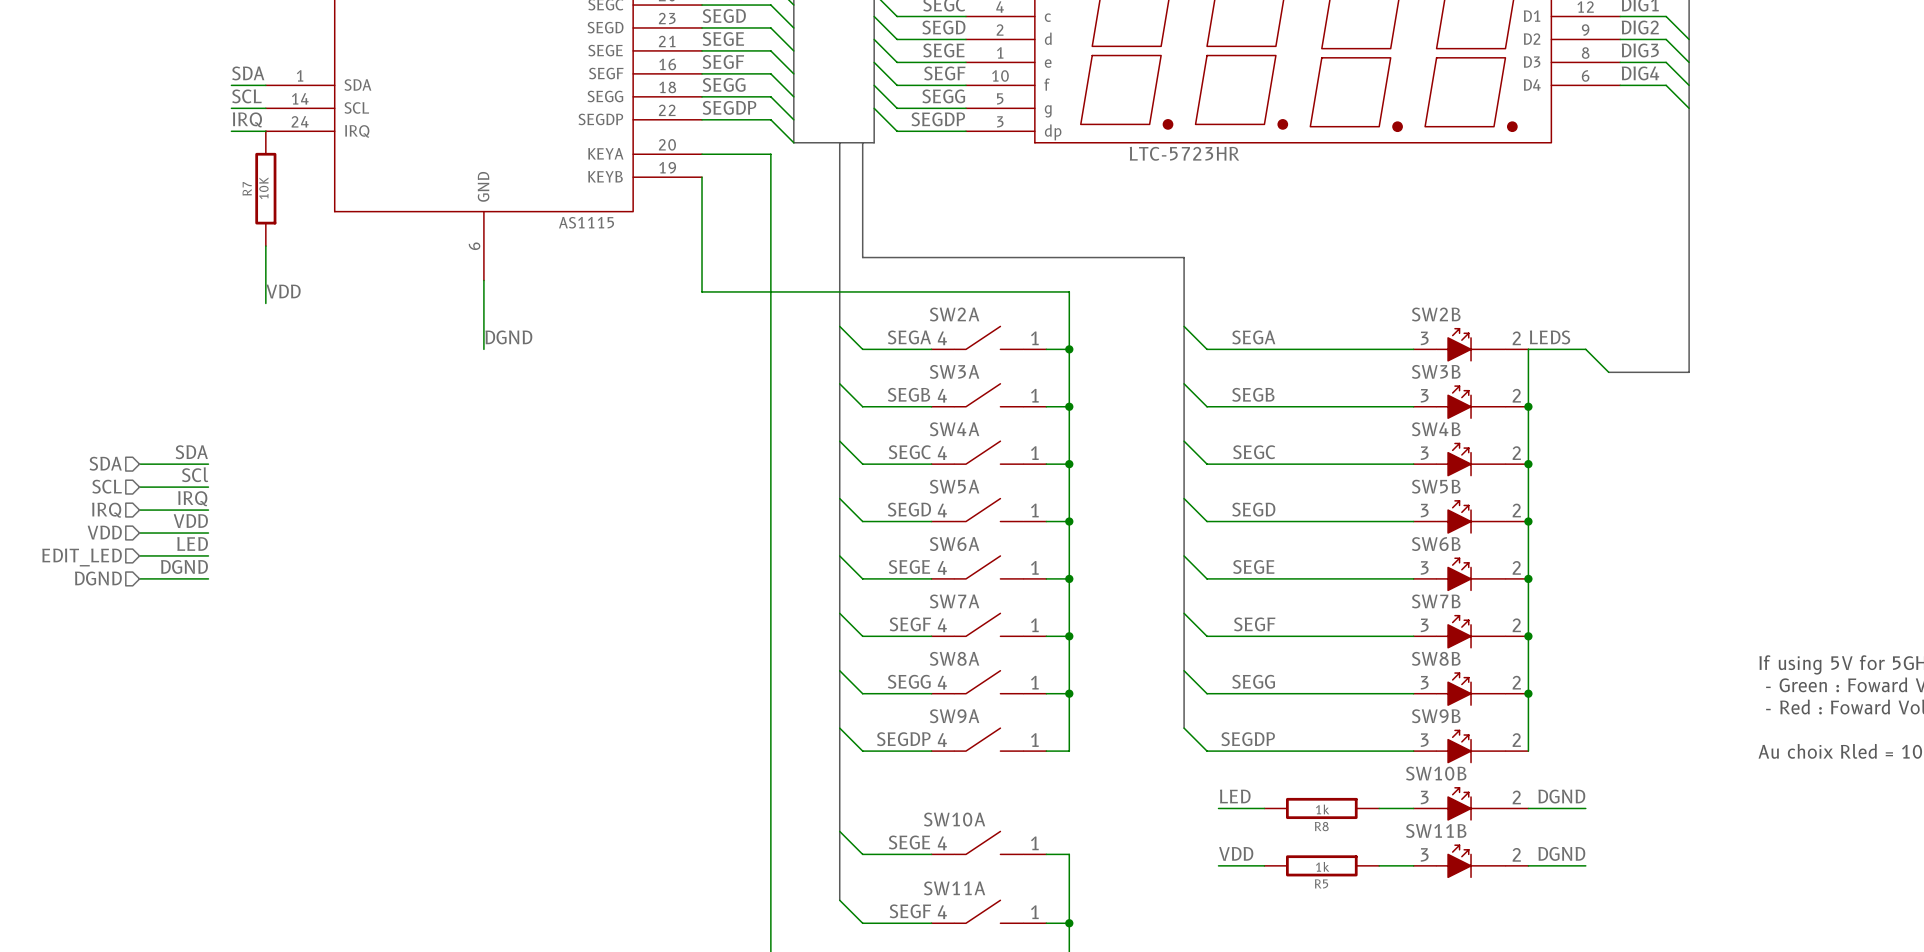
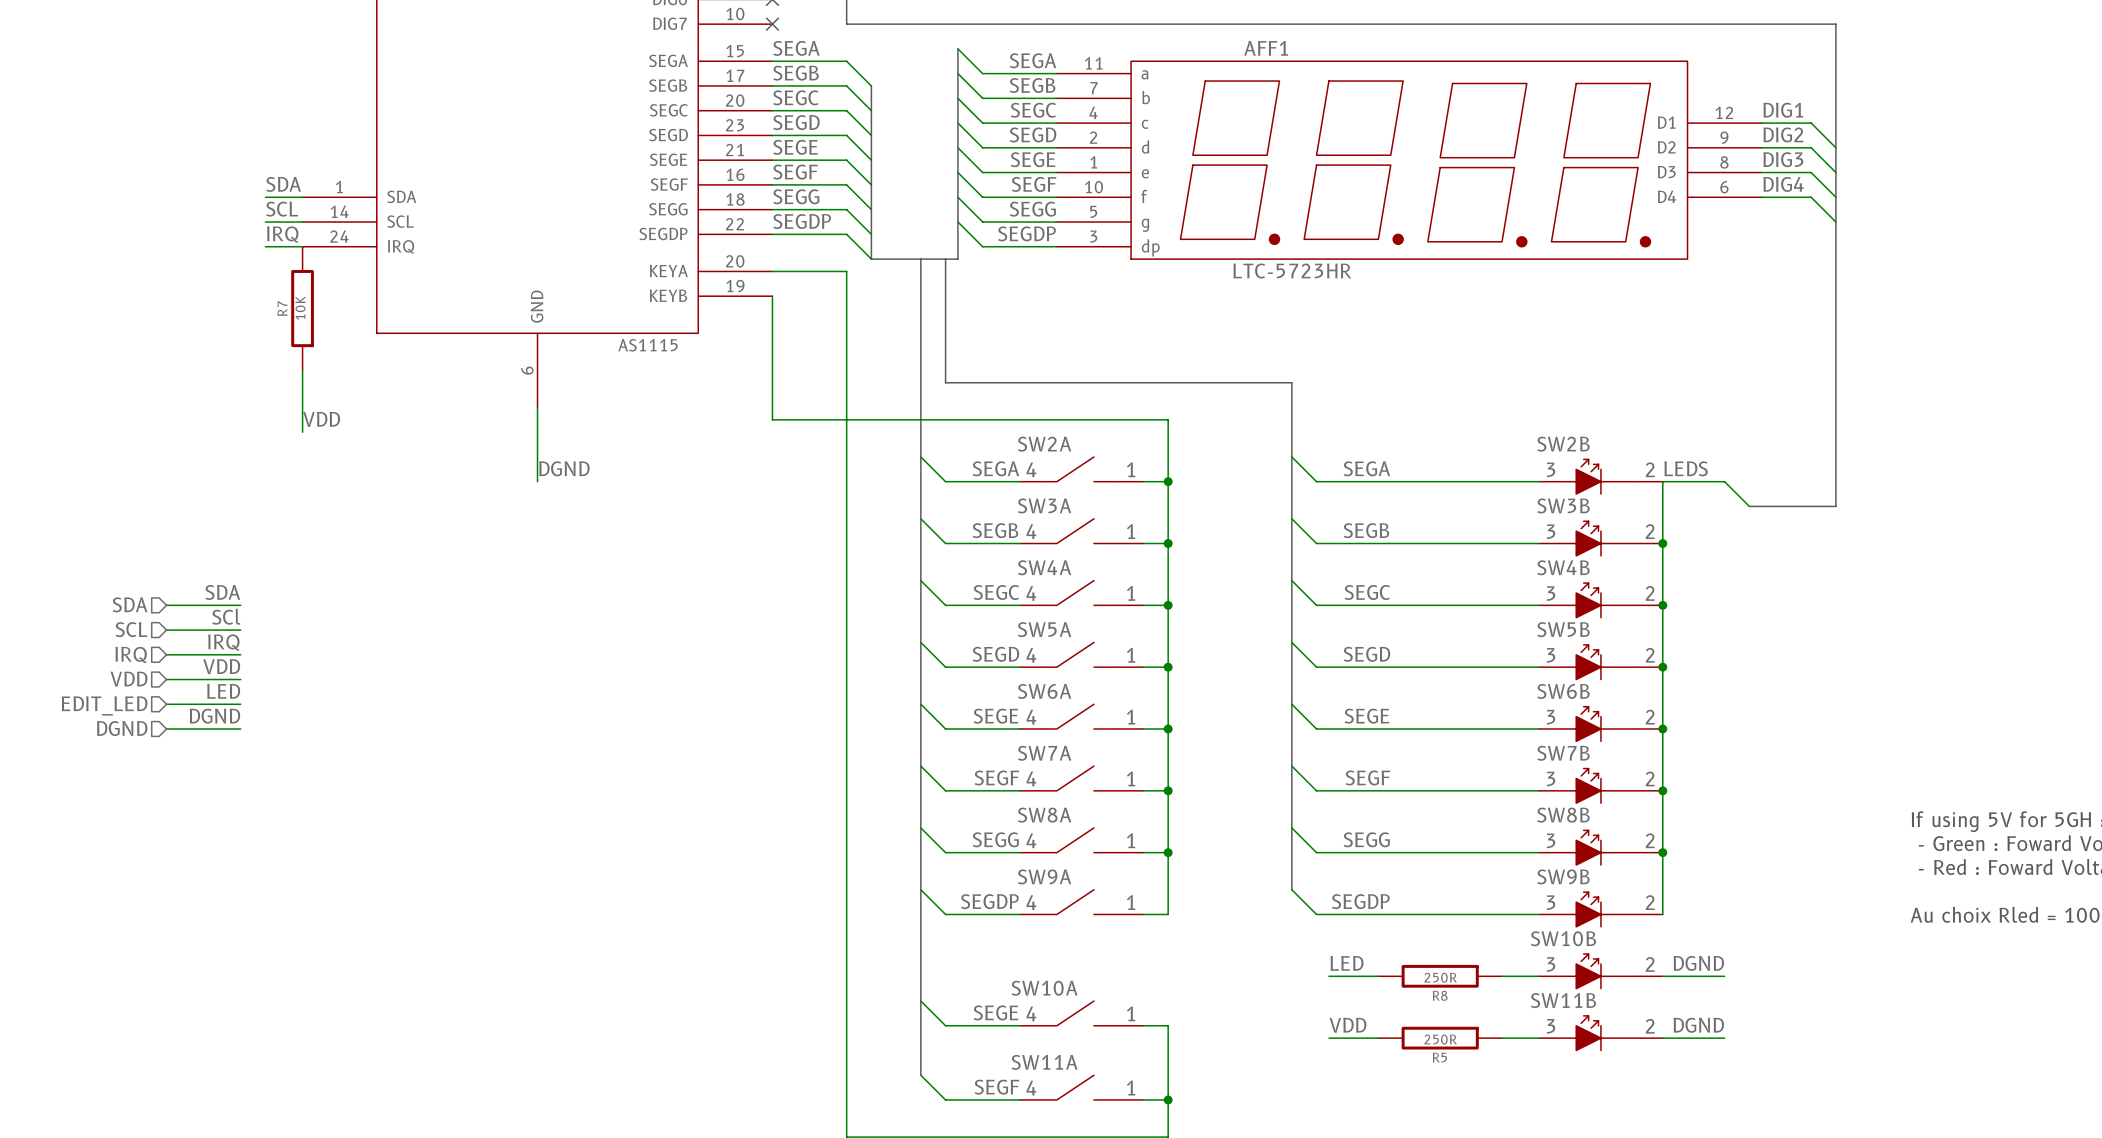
R8 value: 1k (1322, 809) -> 250R (1440, 977)
R5 value: 1k (1322, 866) -> 250R (1440, 1039)

